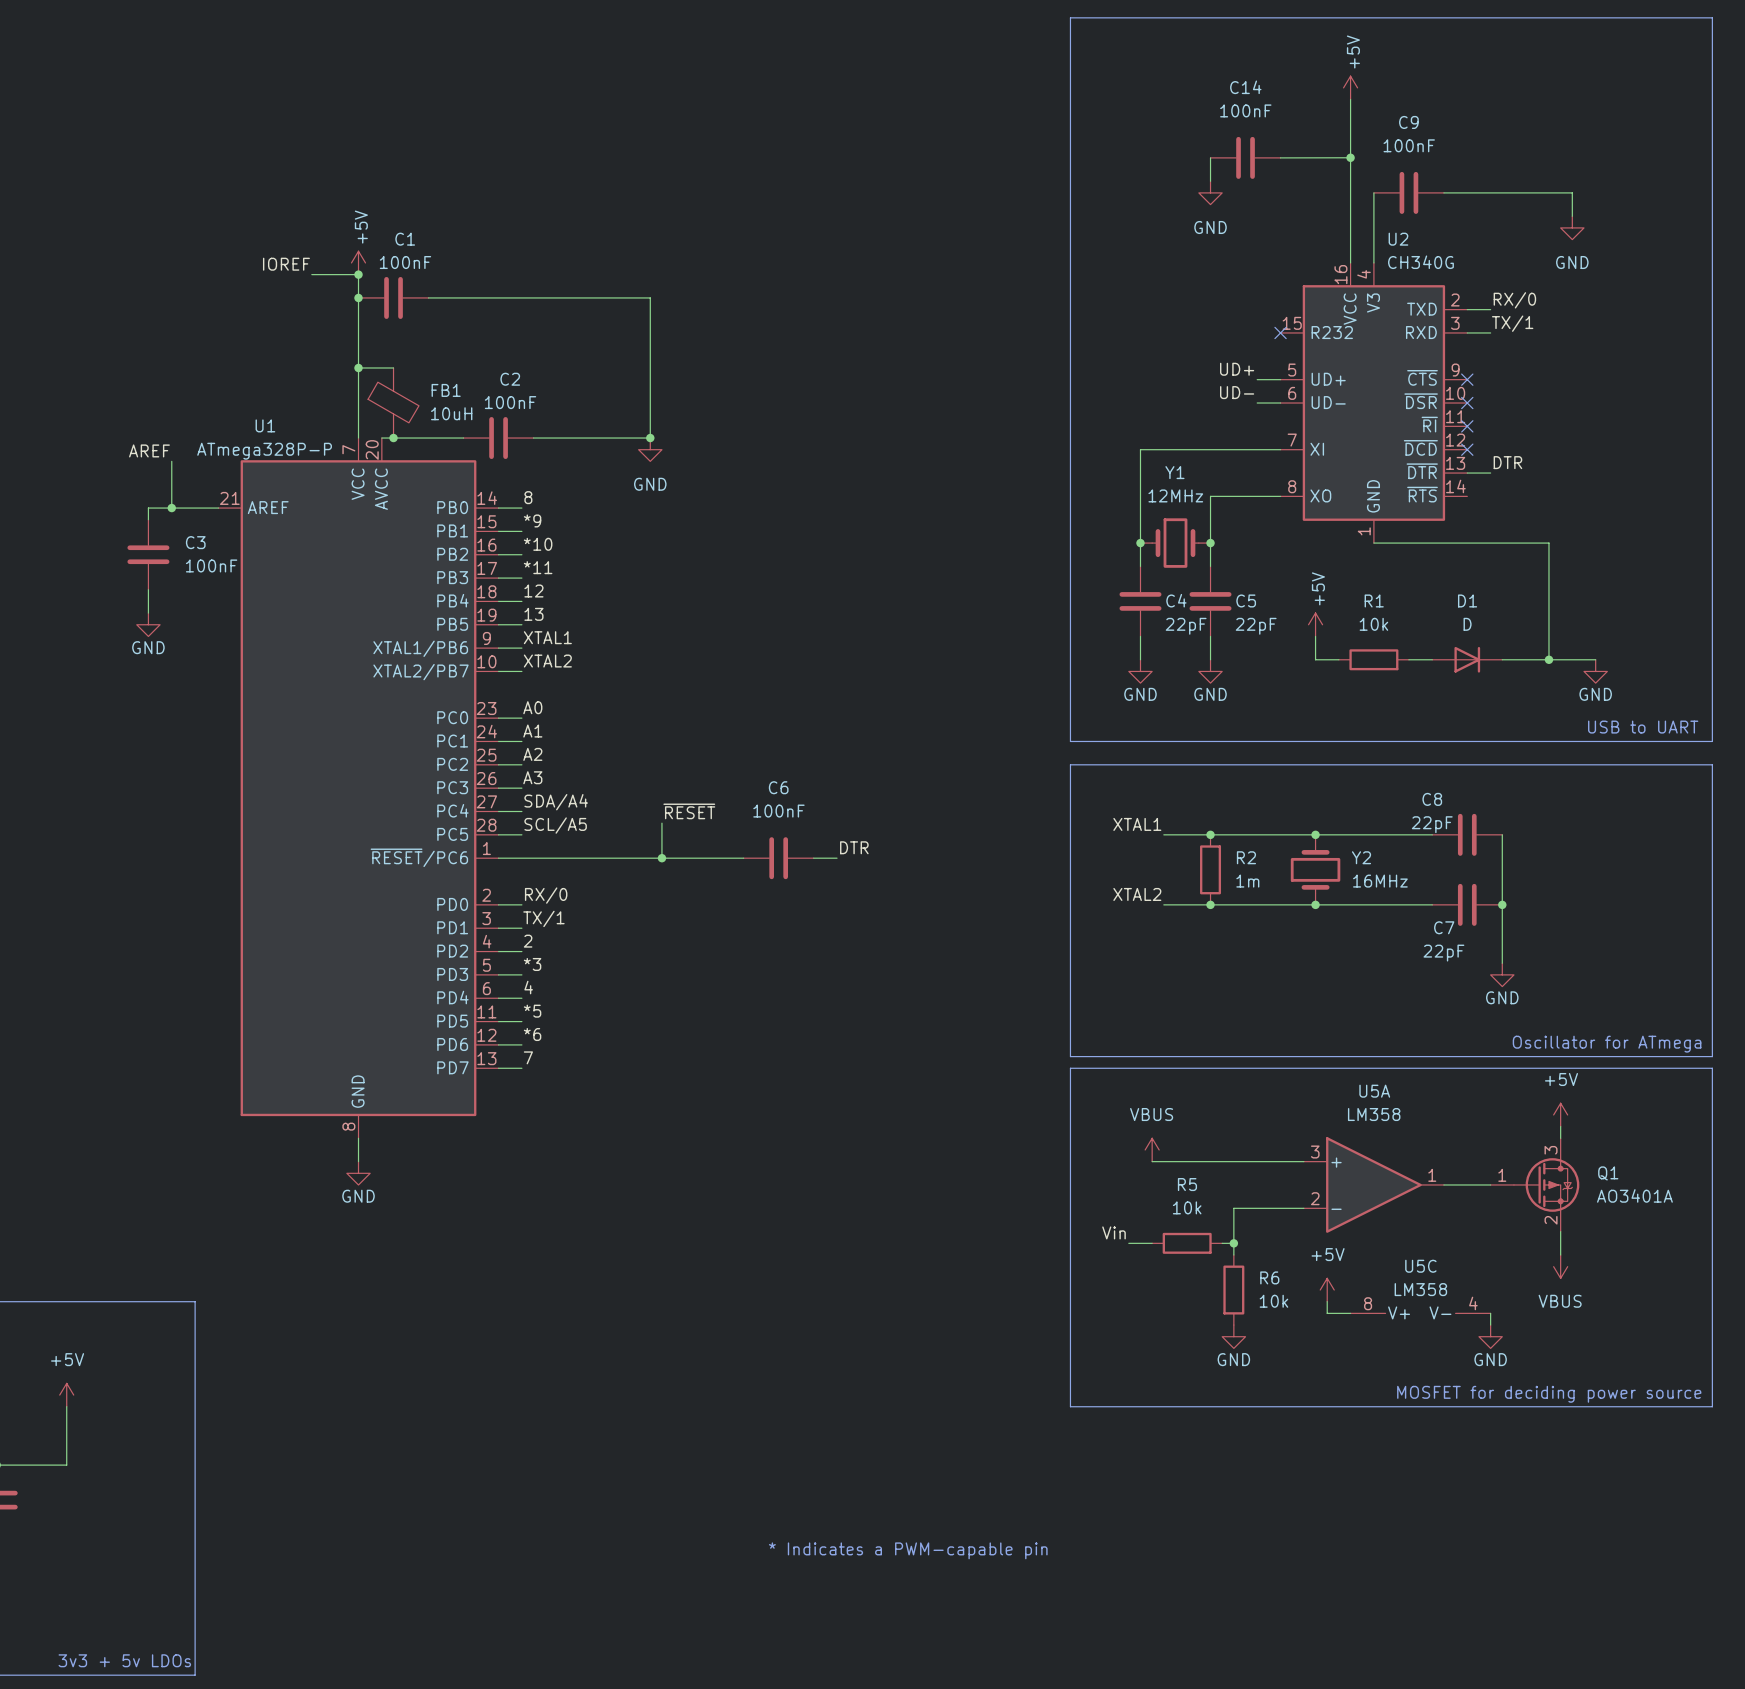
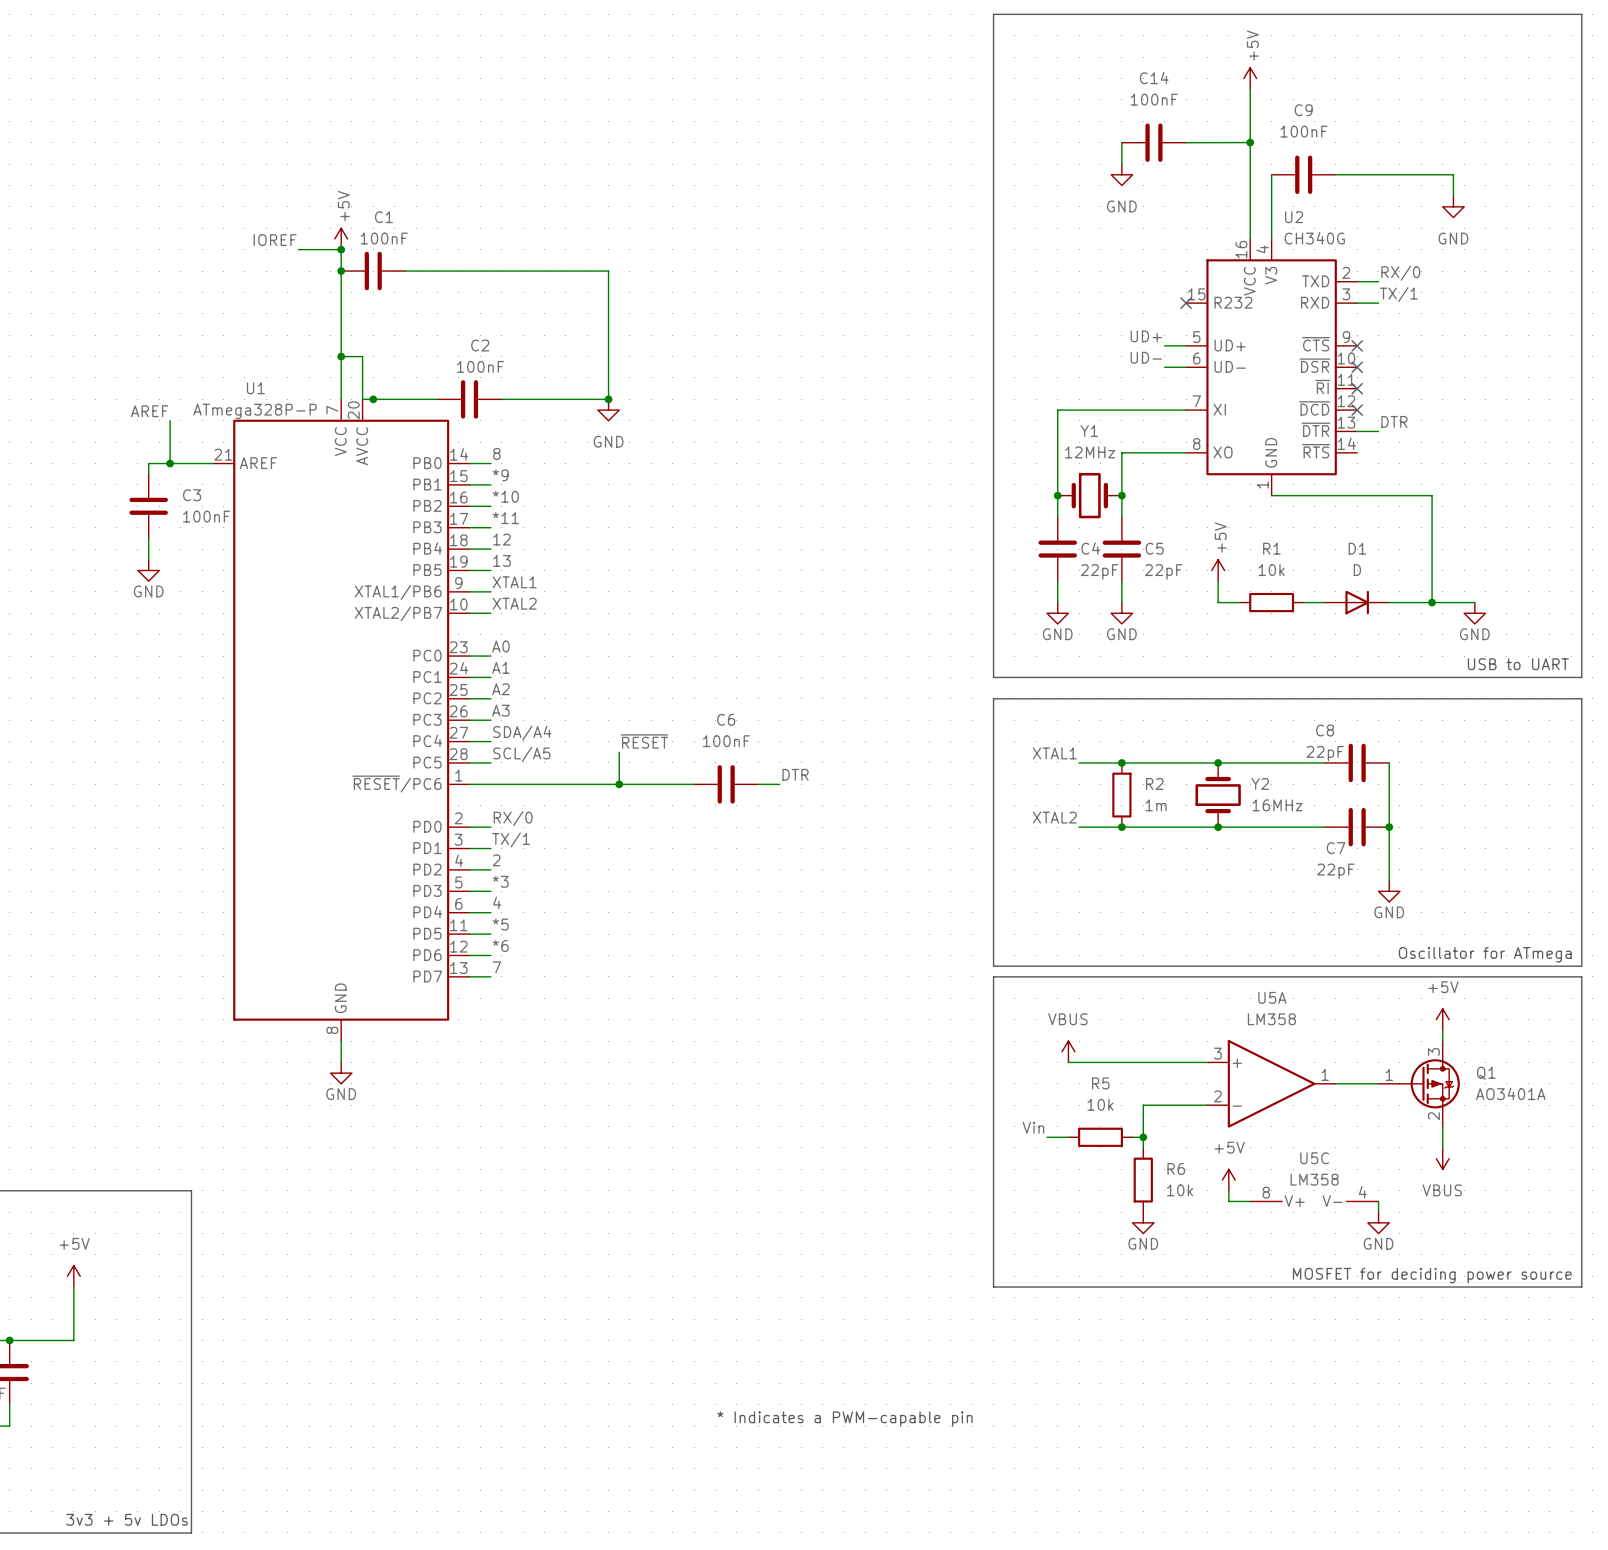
wire: (358, 367) (393, 367) -> none
junction position: (358, 367) -> (341, 356)
wire: none -> (341, 356) (362, 356) (362, 399)
FB1: 10uH (393, 403) -> none

